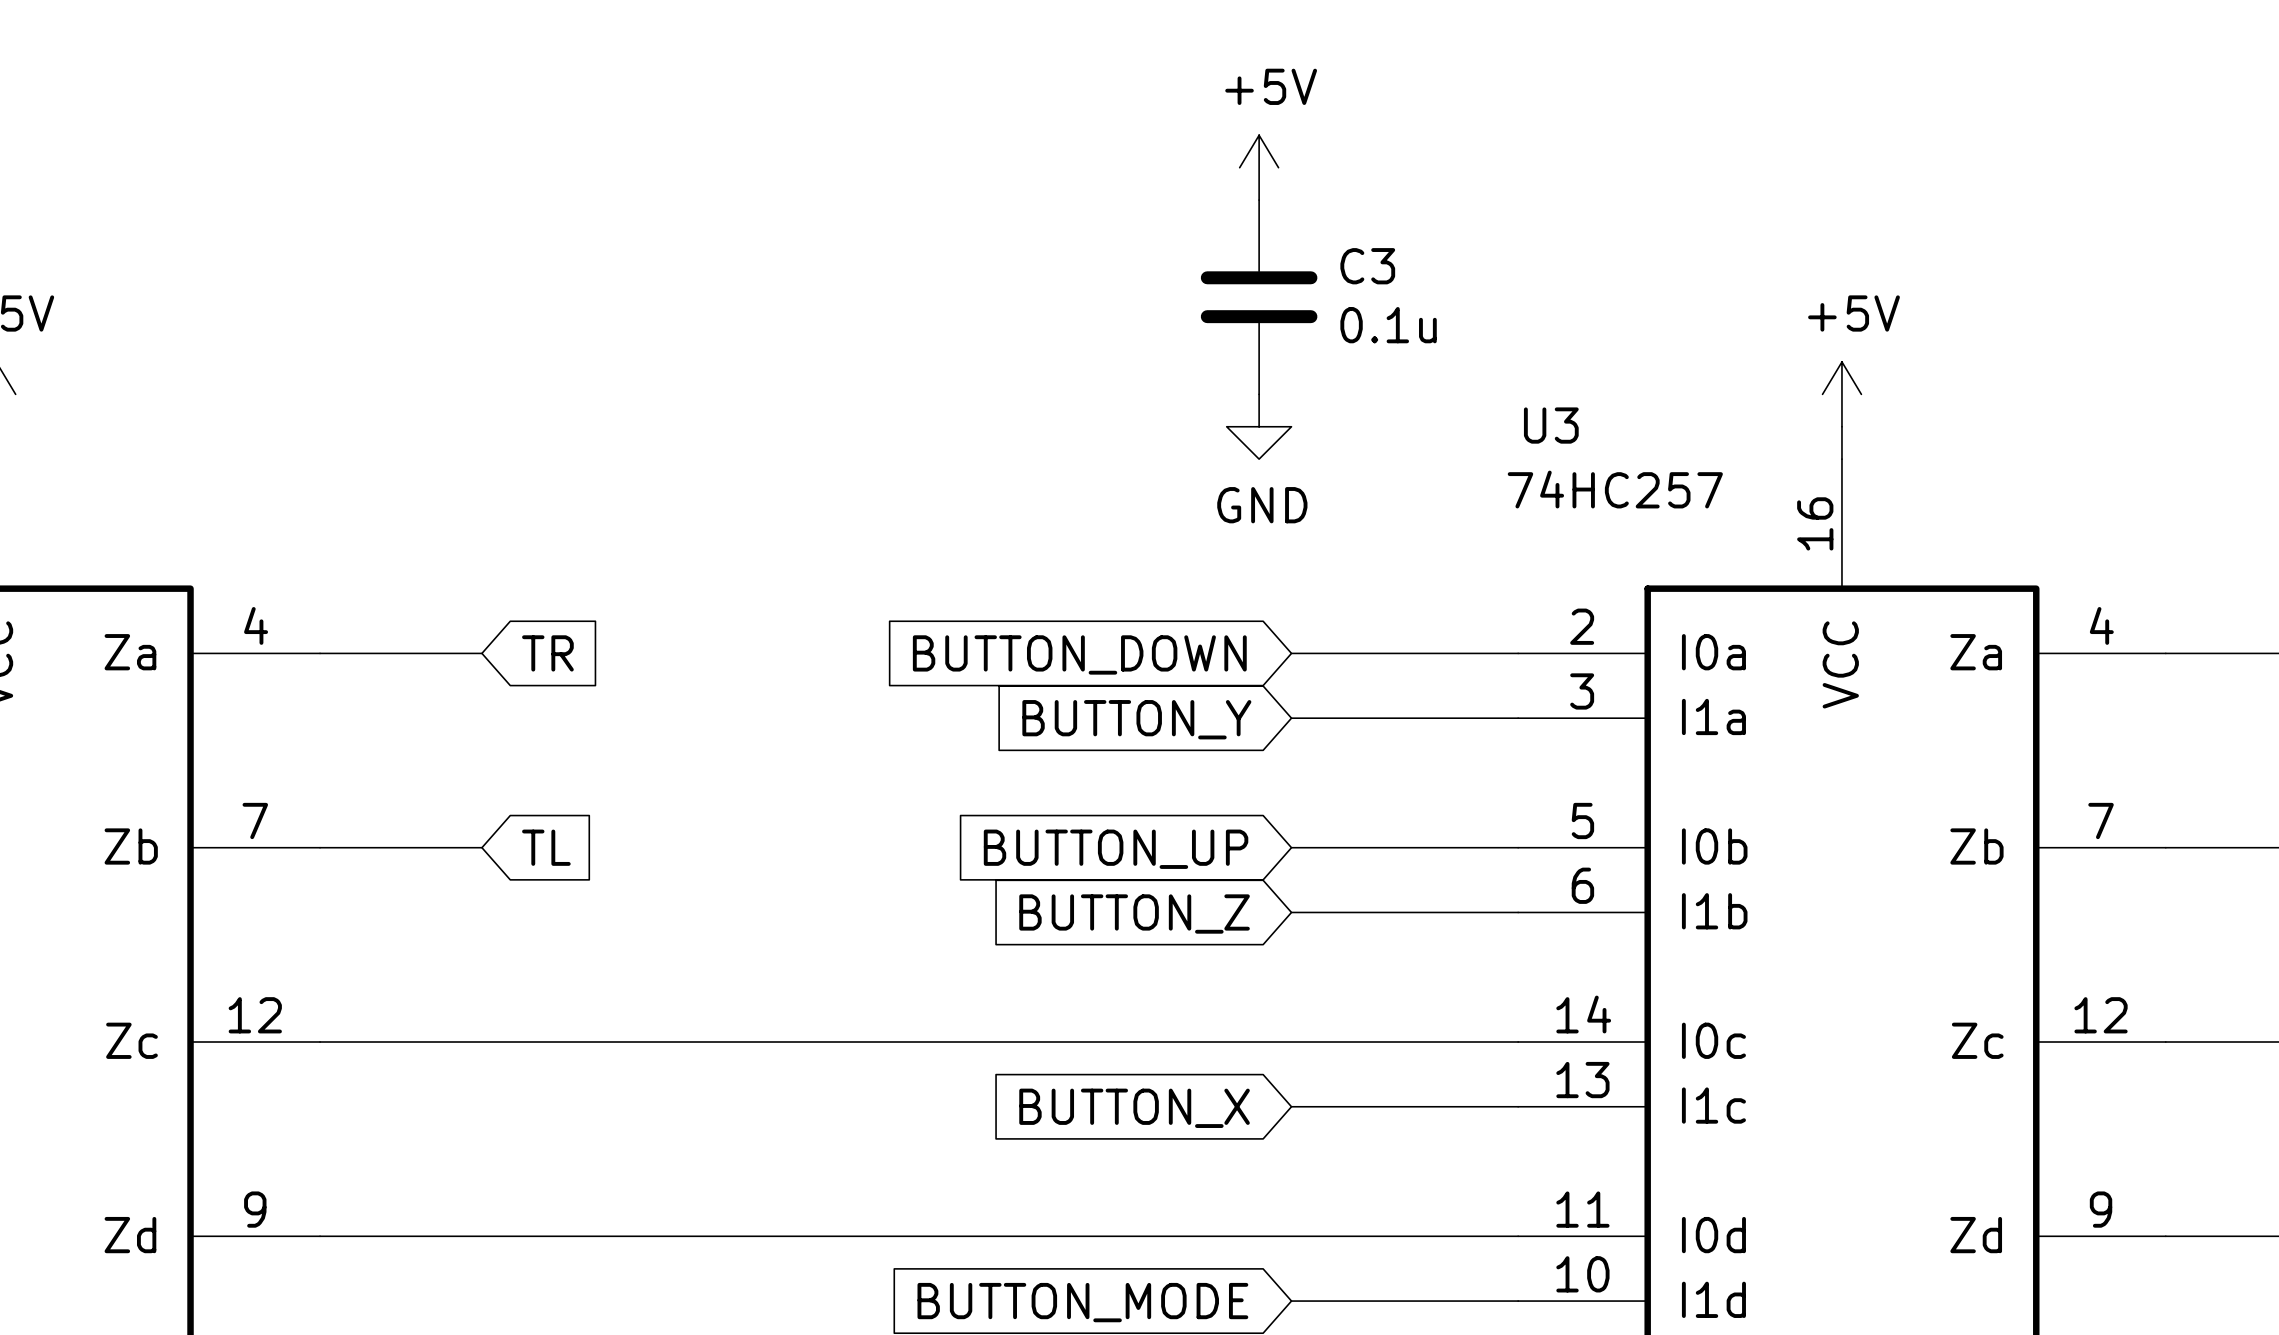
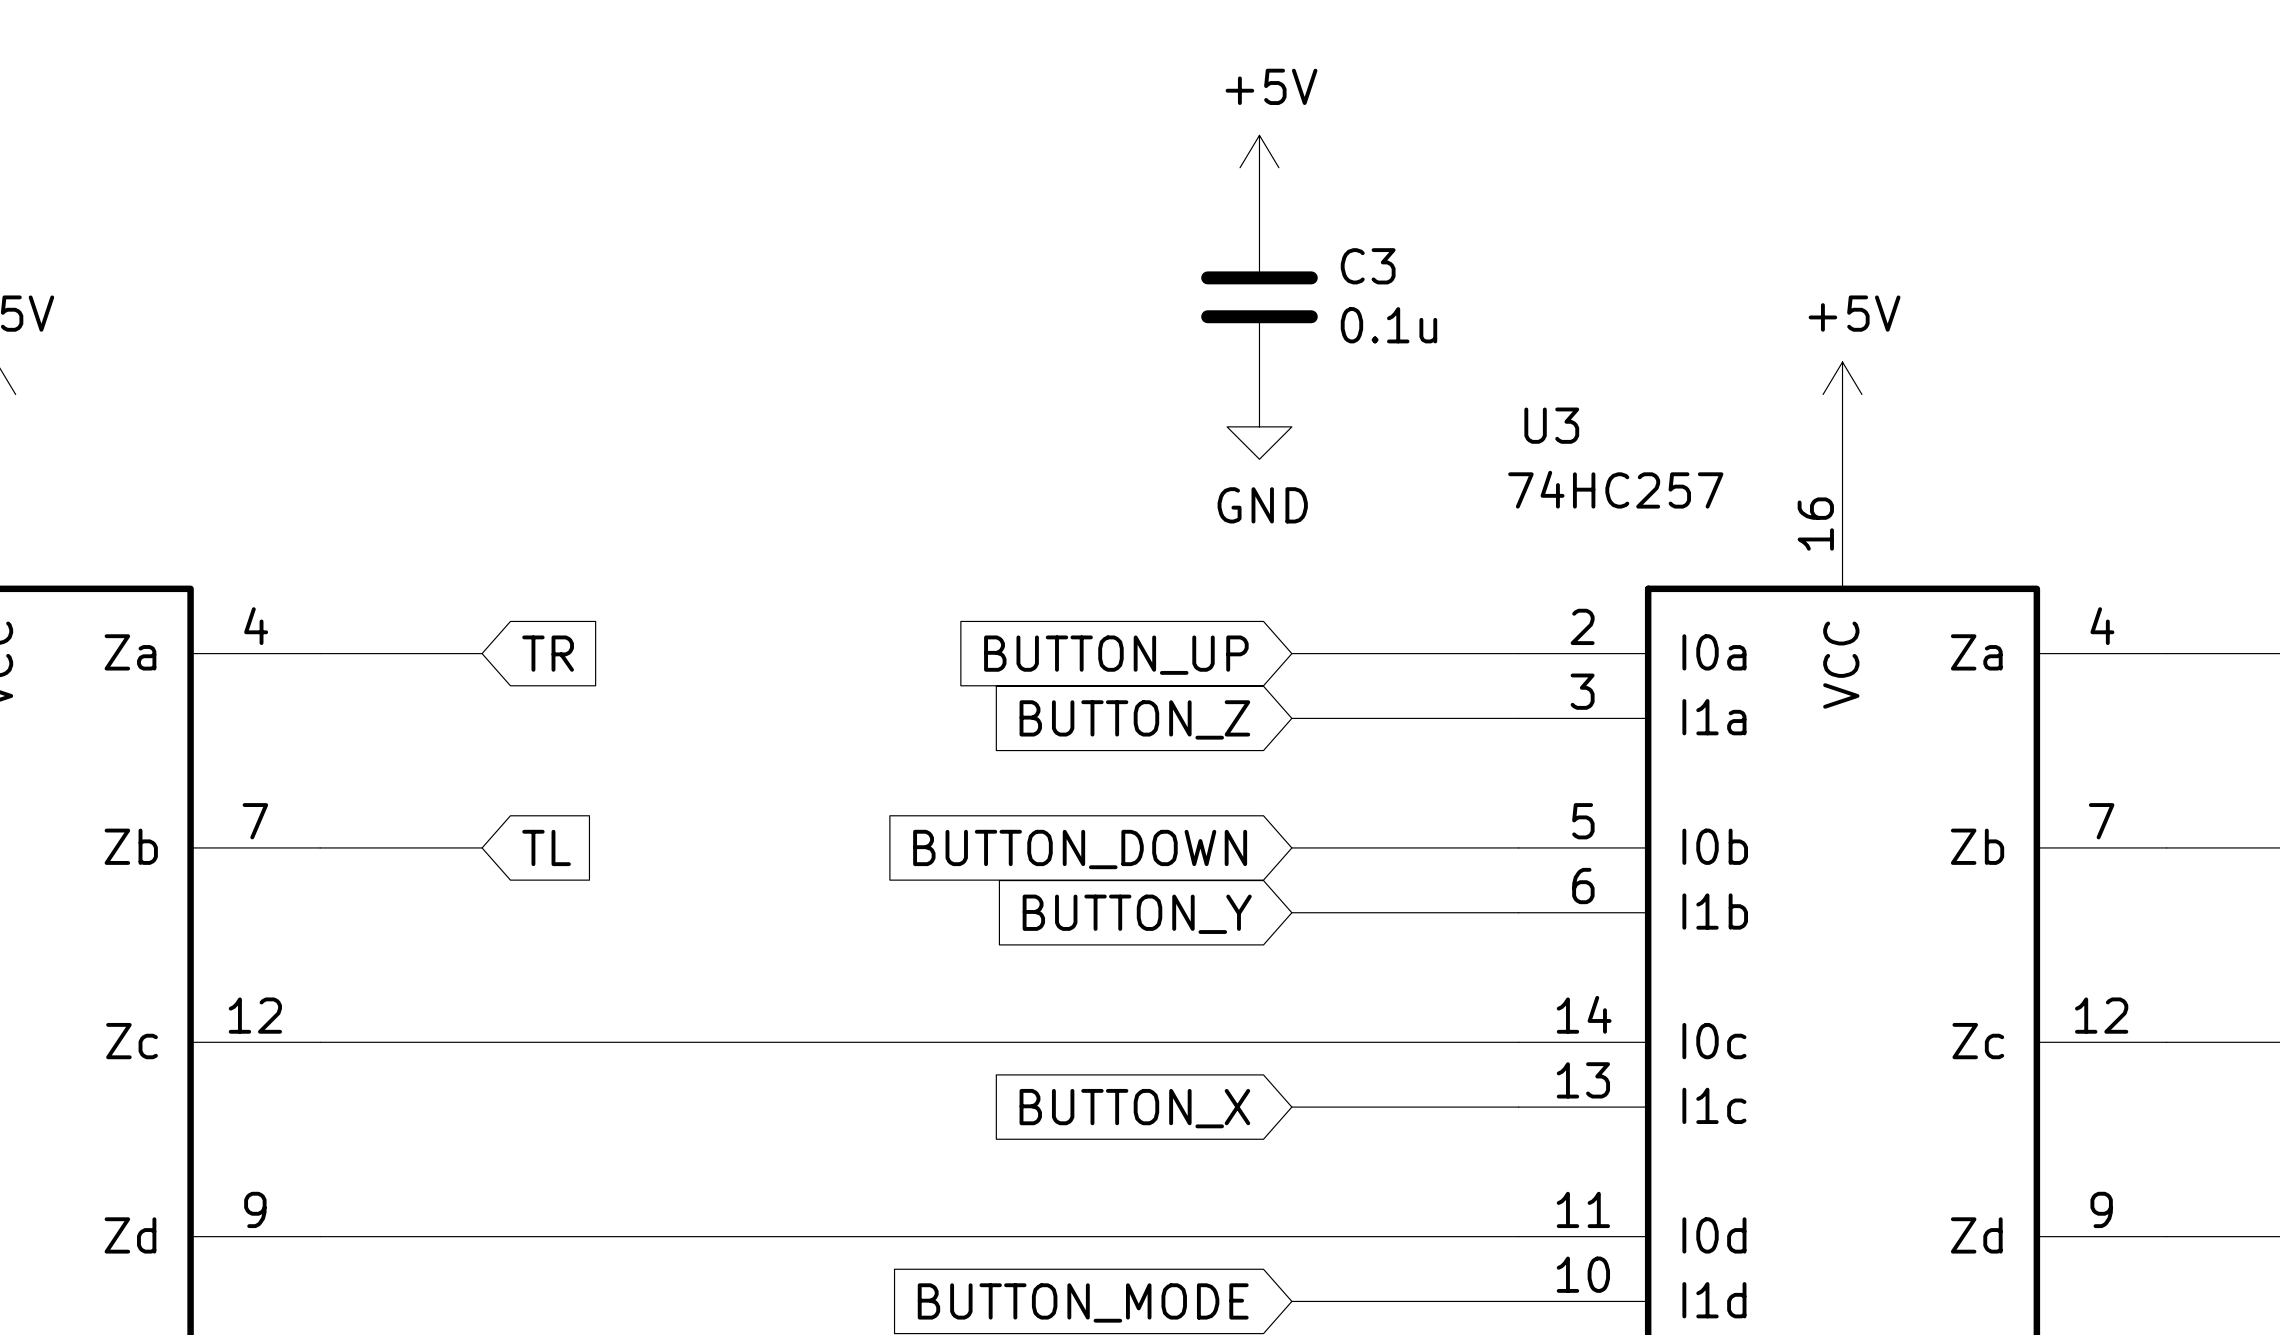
global label: BUTTON_DOWN (1079, 654) -> BUTTON_UP (1116, 655)
global label: BUTTON_Y (1136, 719) -> BUTTON_Z (1134, 719)
global label: BUTTON_UP (1116, 849) -> BUTTON_DOWN (1080, 849)
global label: BUTTON_Z (1134, 914) -> BUTTON_Y (1137, 914)

